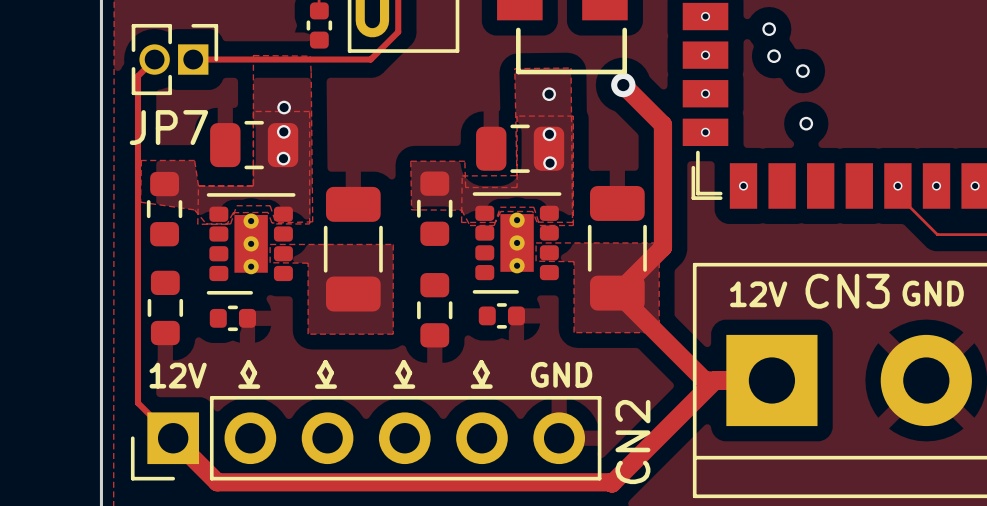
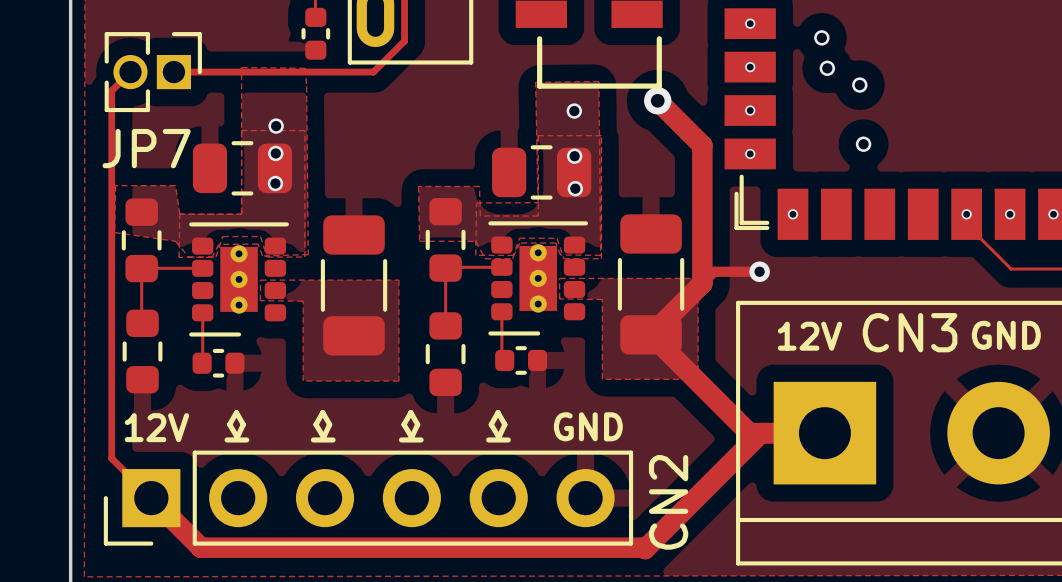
track: none -> (141, 268) (202, 268)
track: none -> (501, 267) (445, 268) (445, 325)
track: none -> (141, 268) (142, 323)
track: none -> (759, 271) (714, 271) (702, 283)
via: none -> (759, 271)
track: none -> (501, 311) (501, 357) (504, 360)
track: none -> (202, 312) (202, 363)

